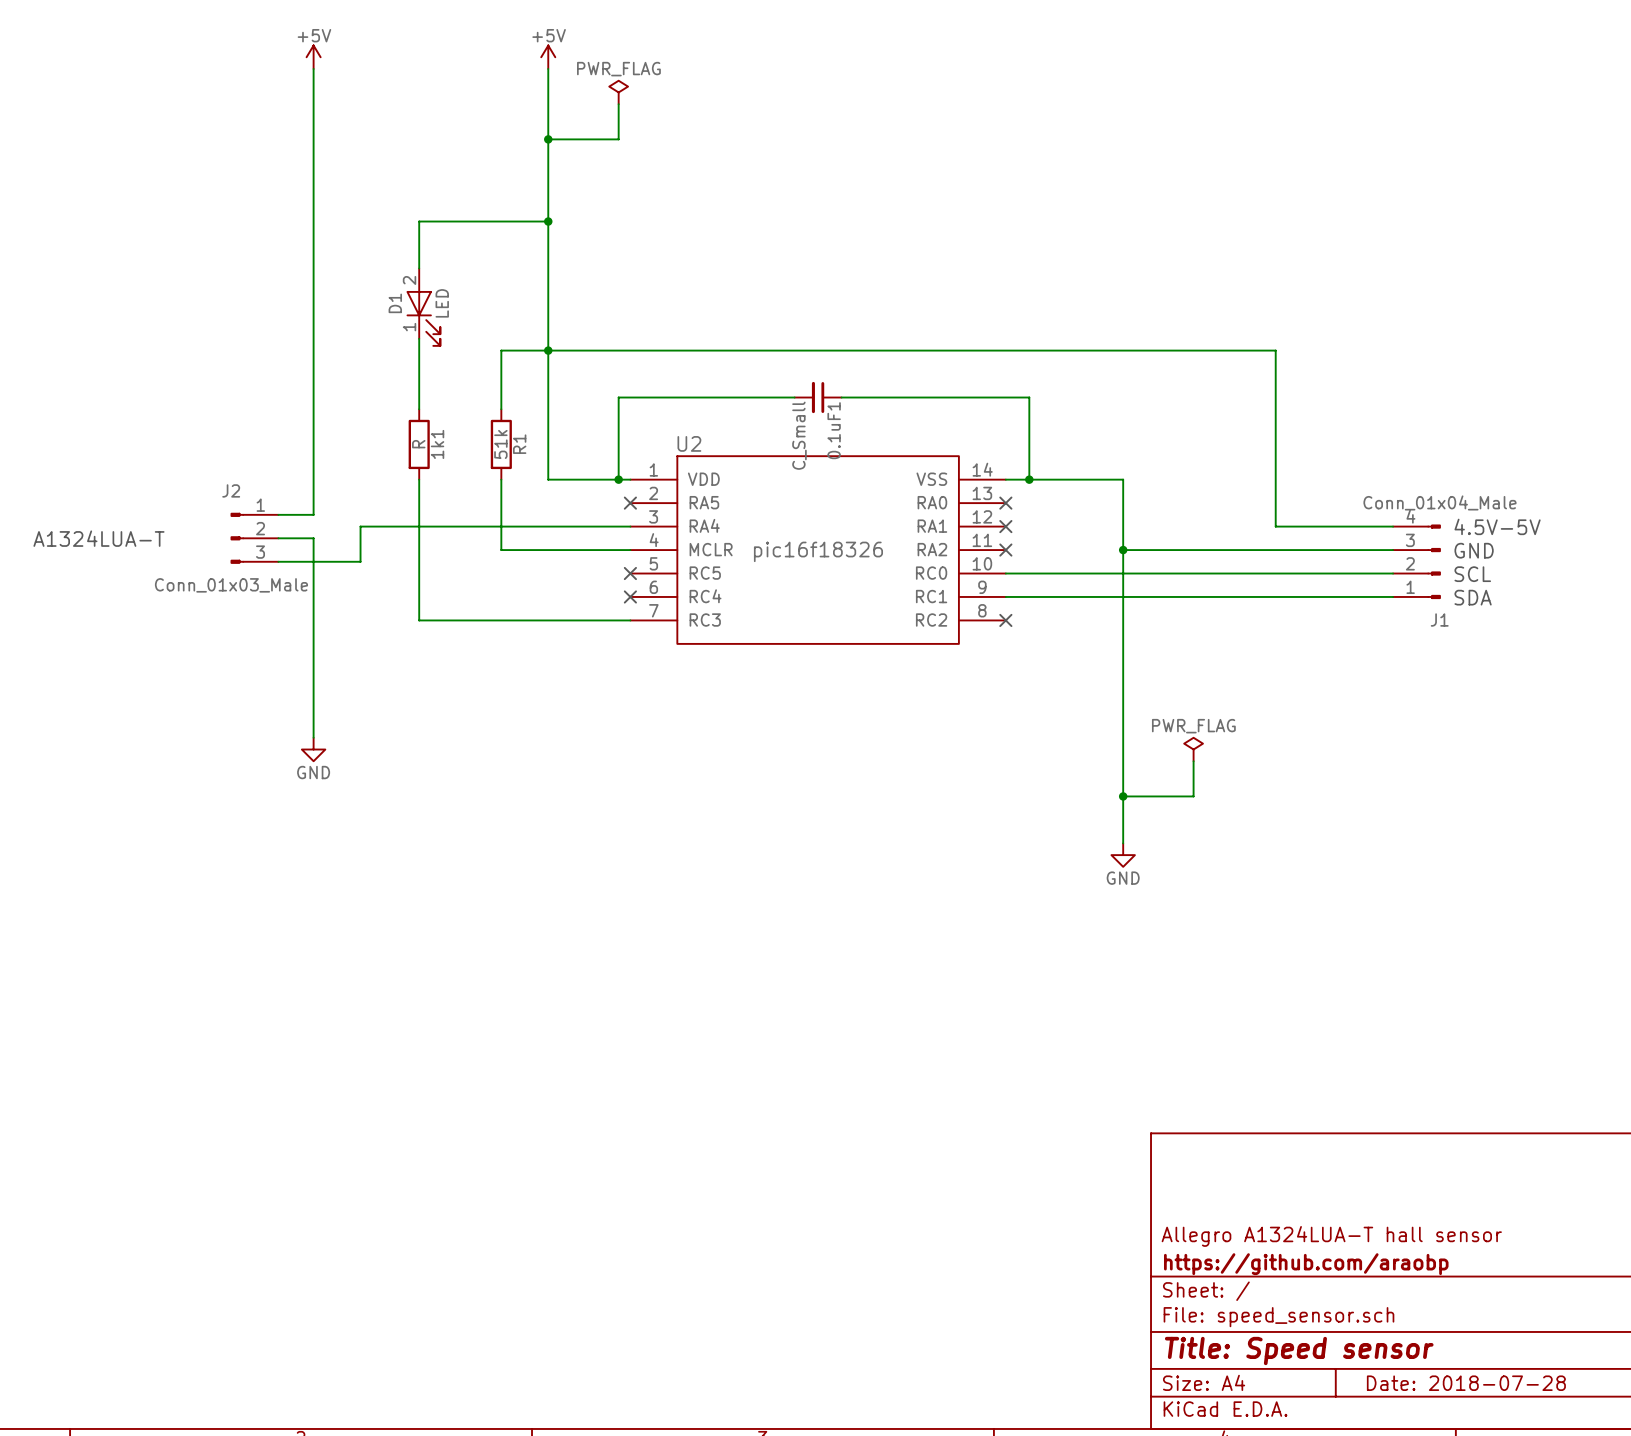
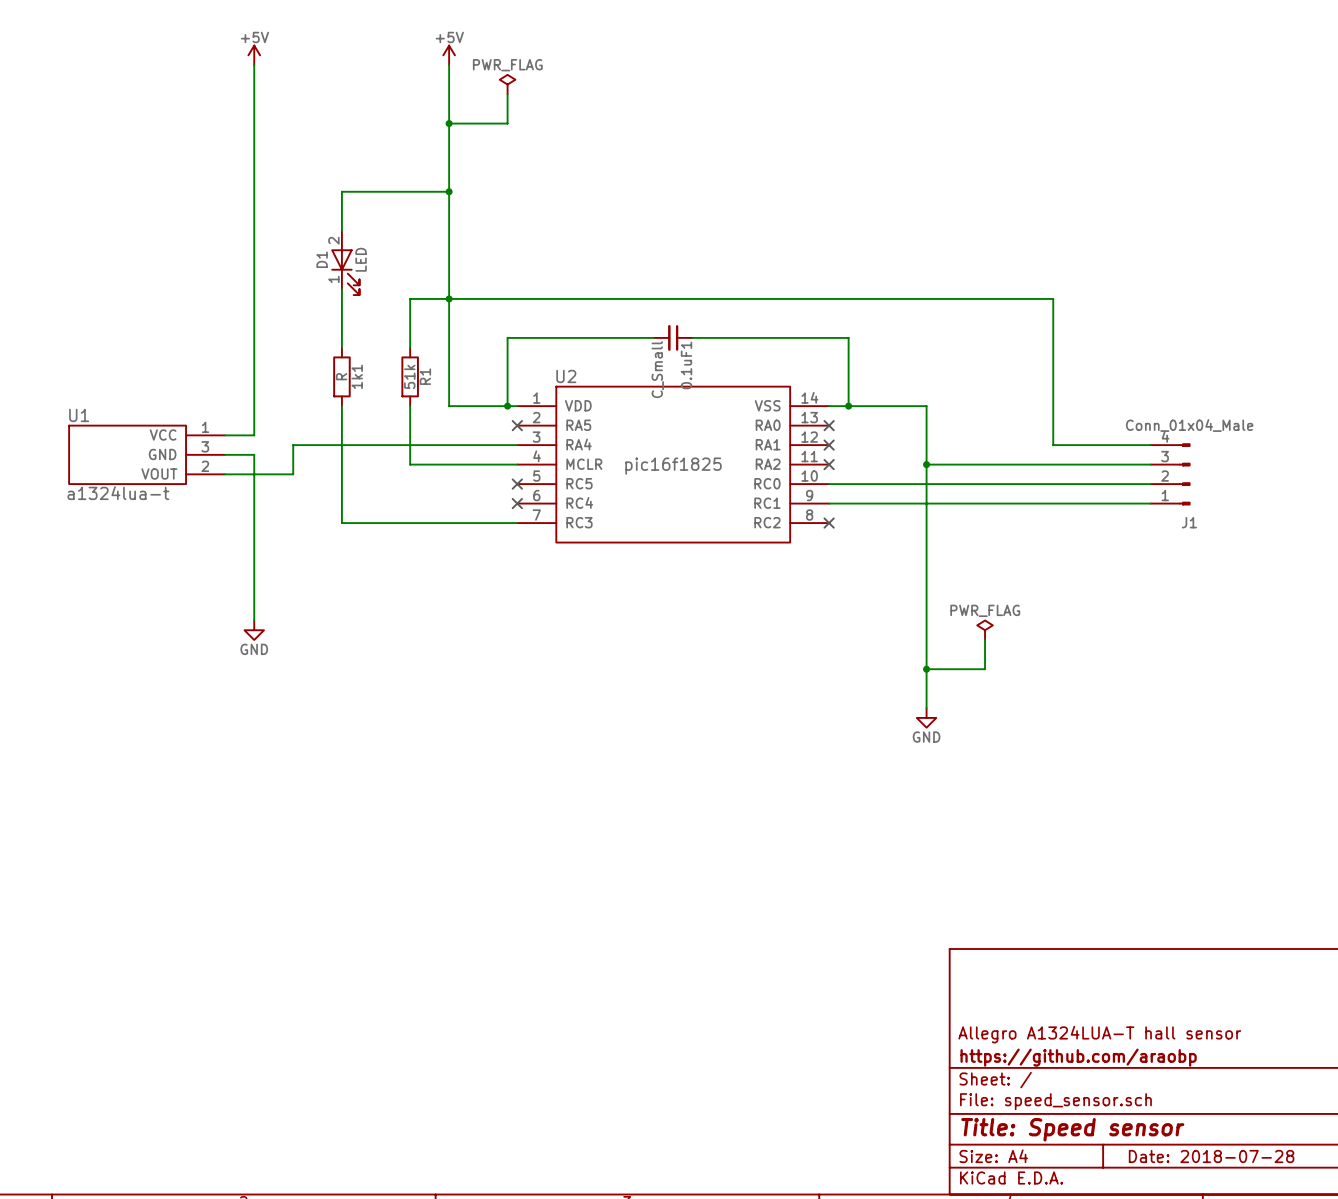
text: 4.5V-5V (1497, 526) -> none
text: A1324LUA-T (98, 538) -> none
U1: none -> a1324lua-t (147, 454)
J2: Conn_01x03_Male (254, 538) -> none
text: GND (1474, 550) -> none
U2 value: pic16f18326 (818, 551) -> pic16f1825 (673, 466)
text: SCL (1472, 574) -> none
text: SDA (1473, 597) -> none

